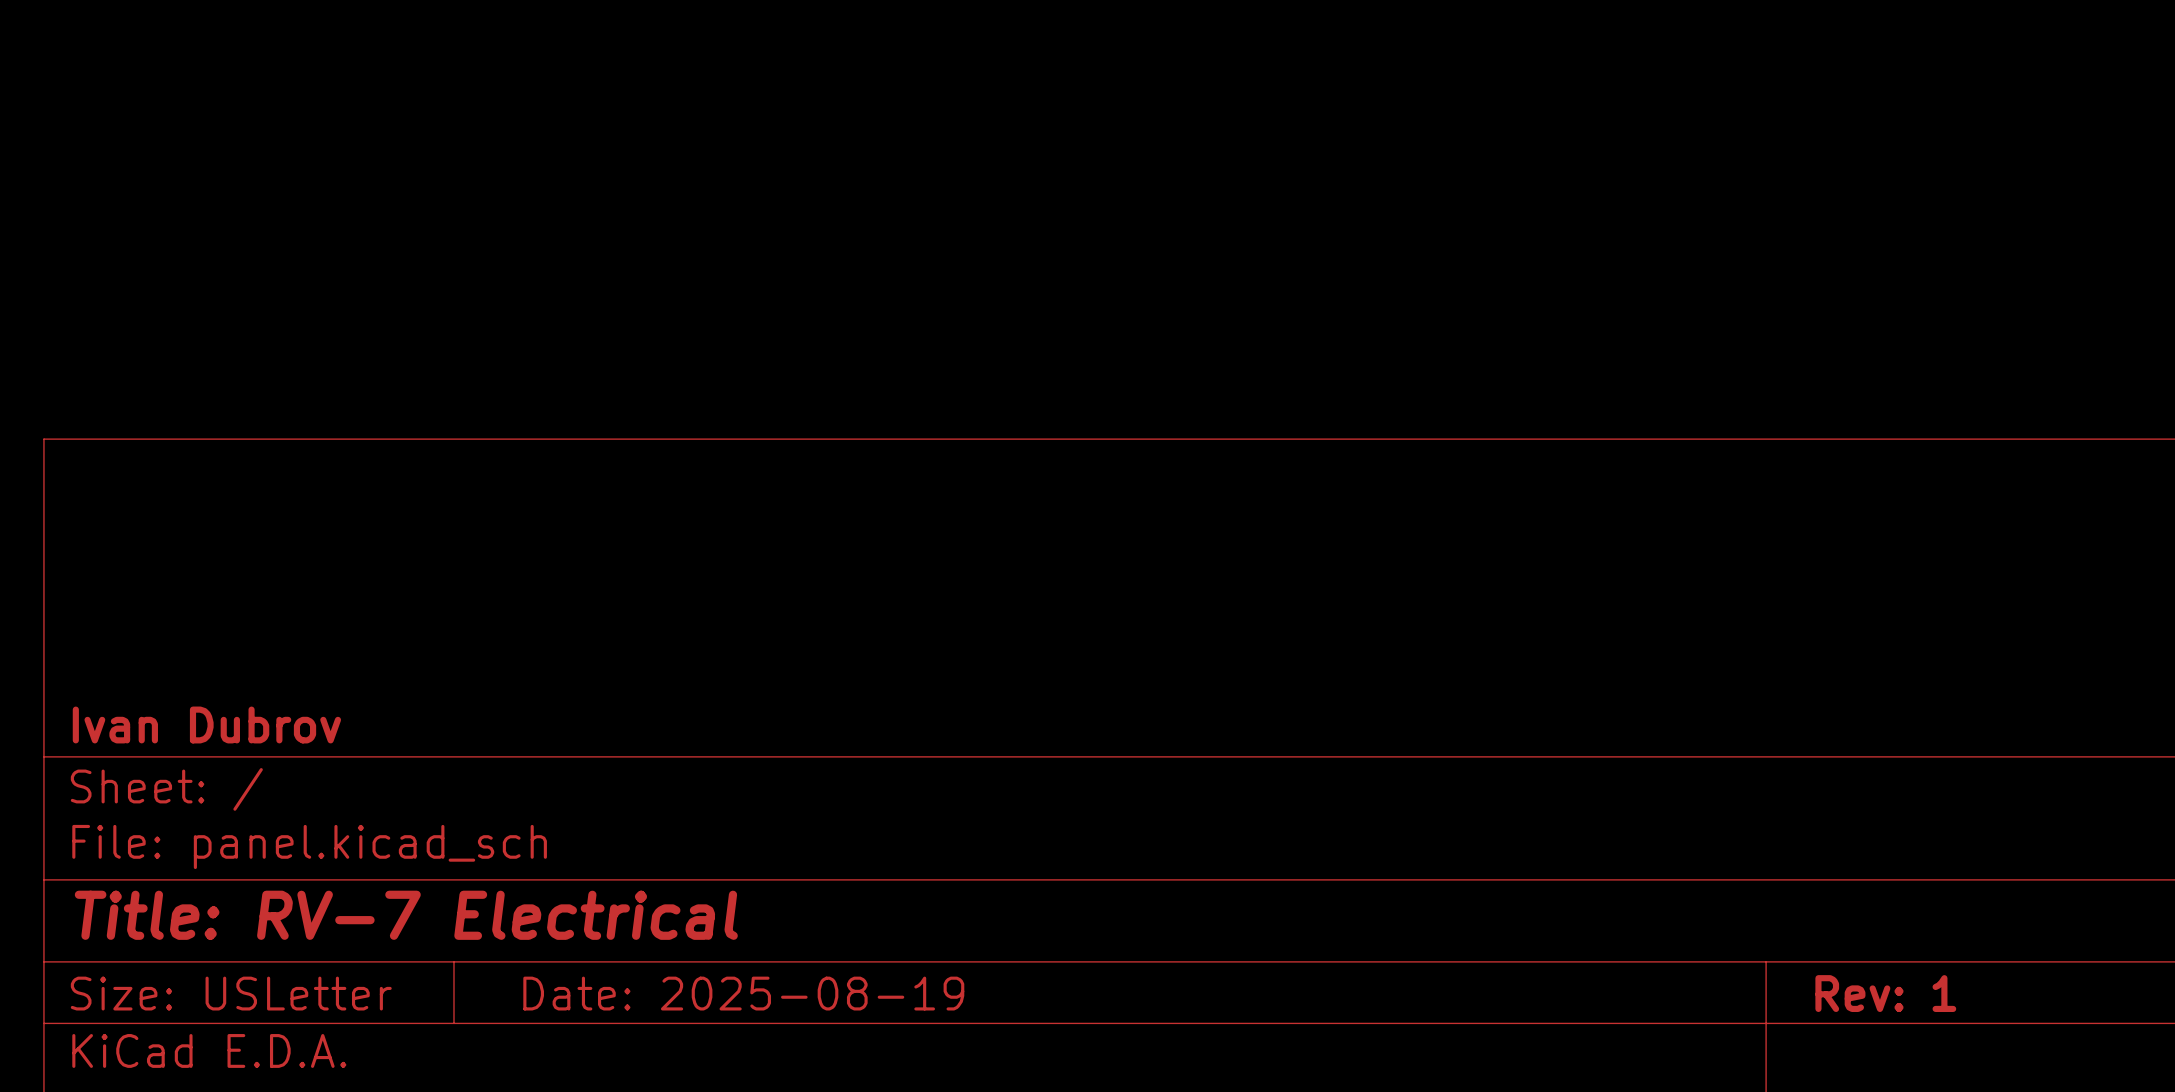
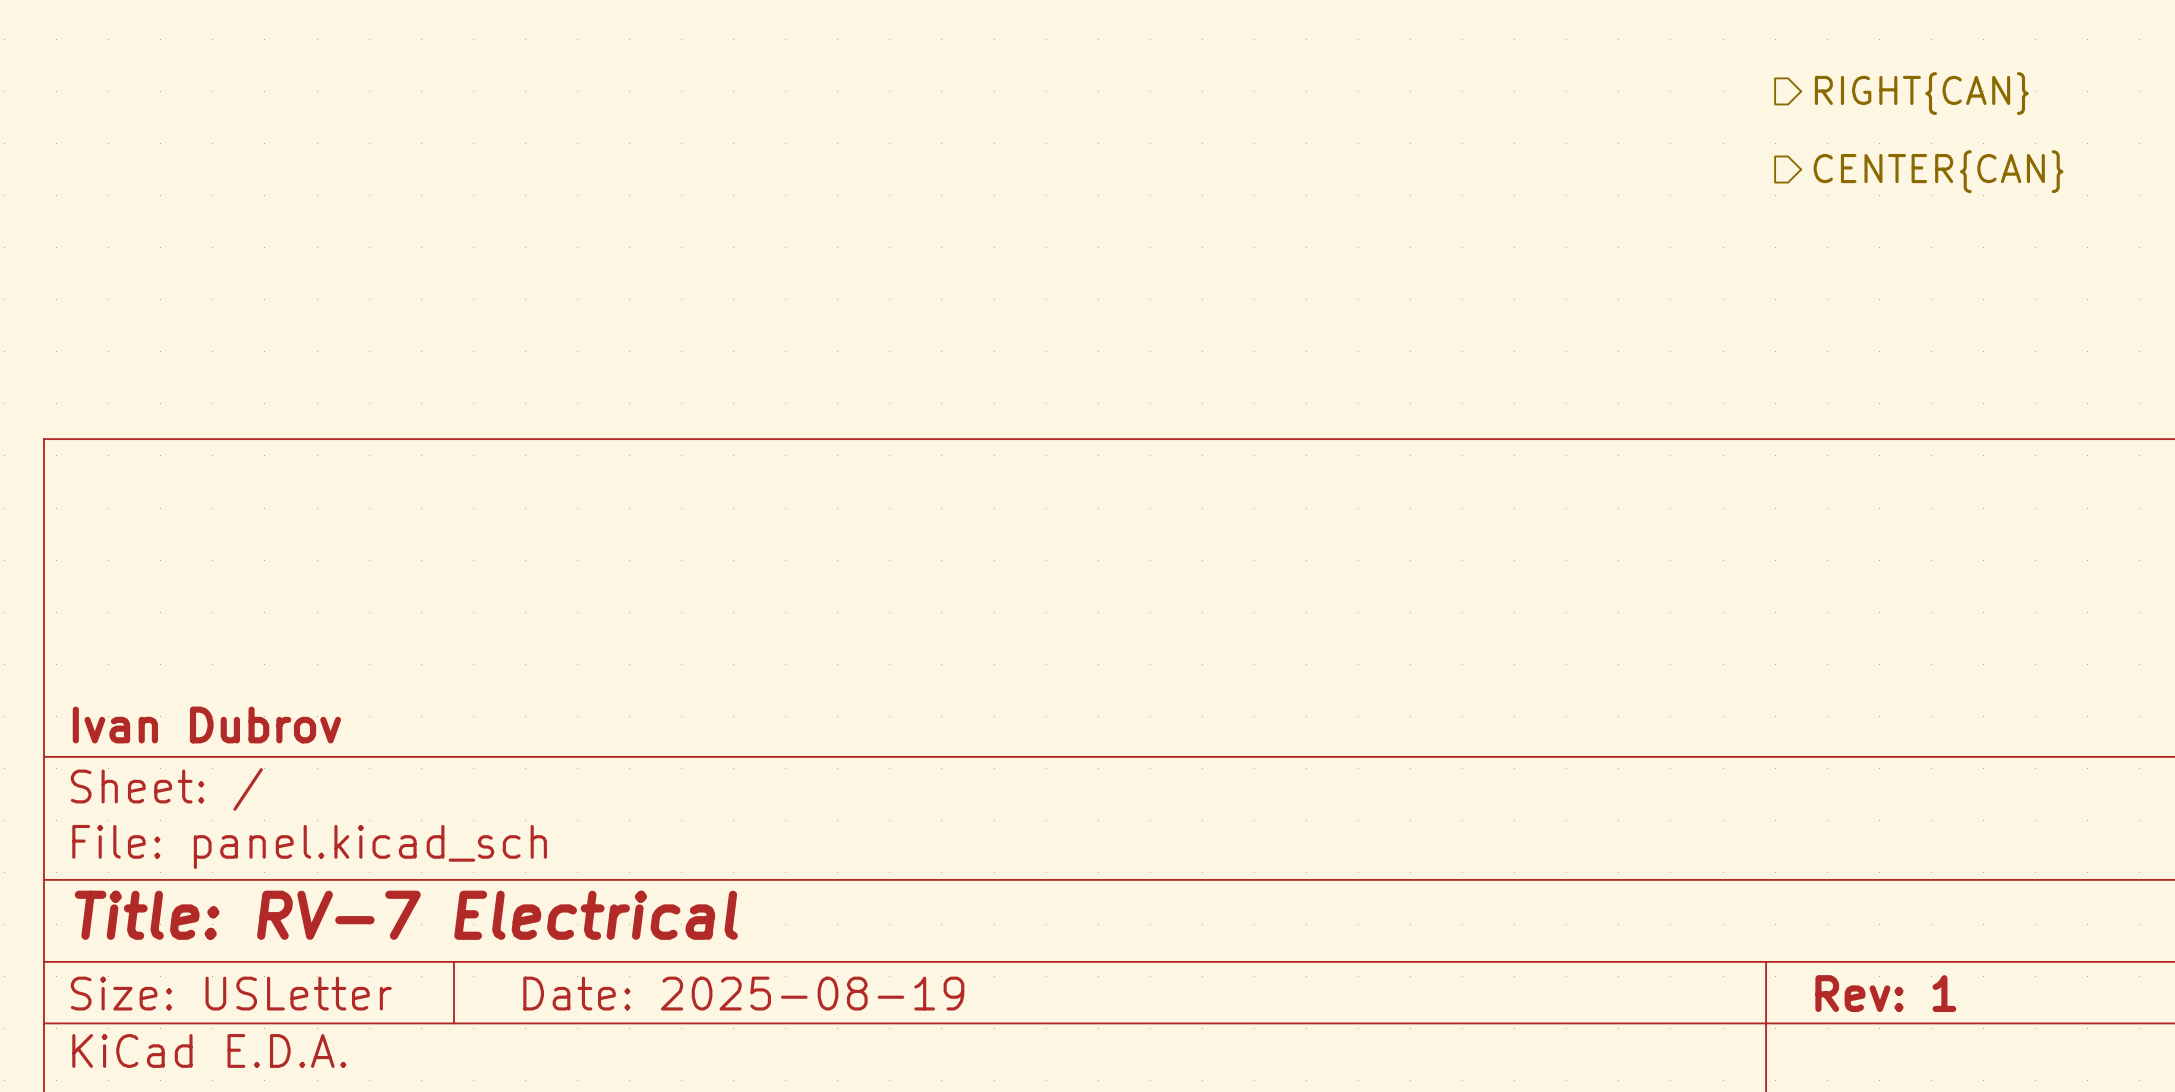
hierarchical label: none -> RIGHT{CAN} (1921, 93)
hierarchical label: none -> CENTER{CAN} (1938, 171)

